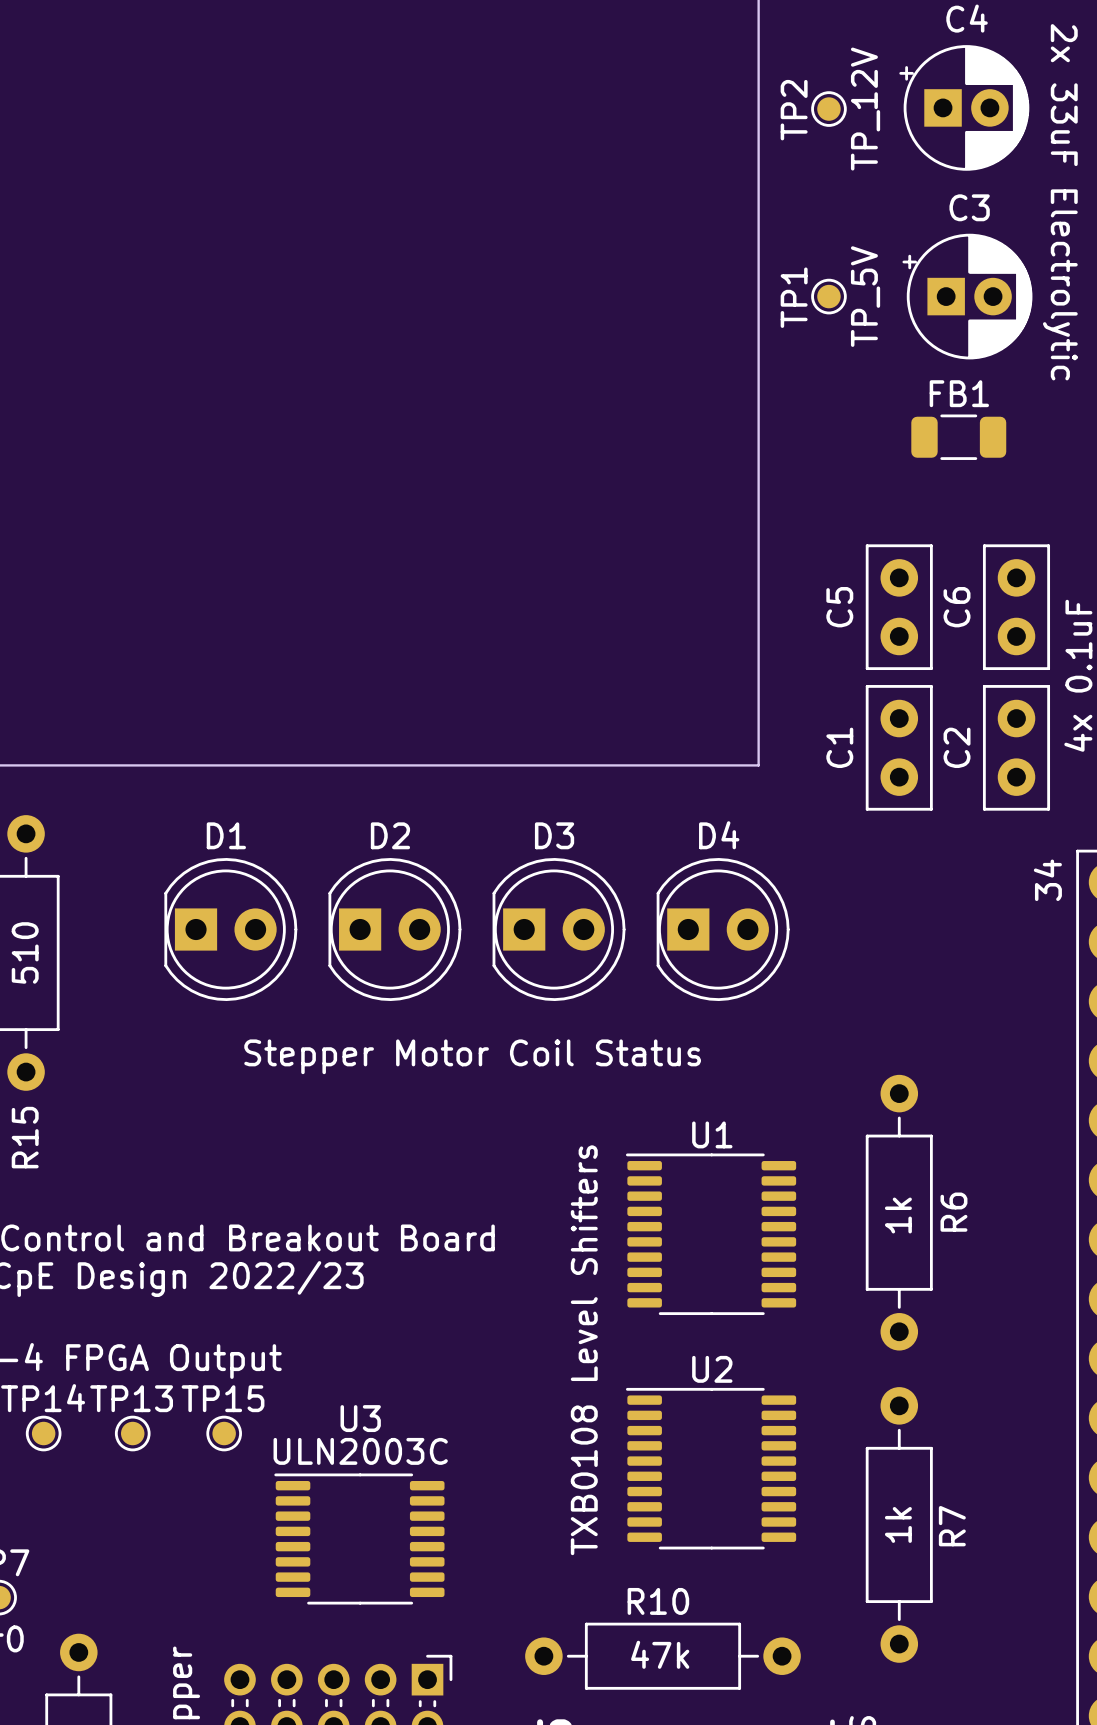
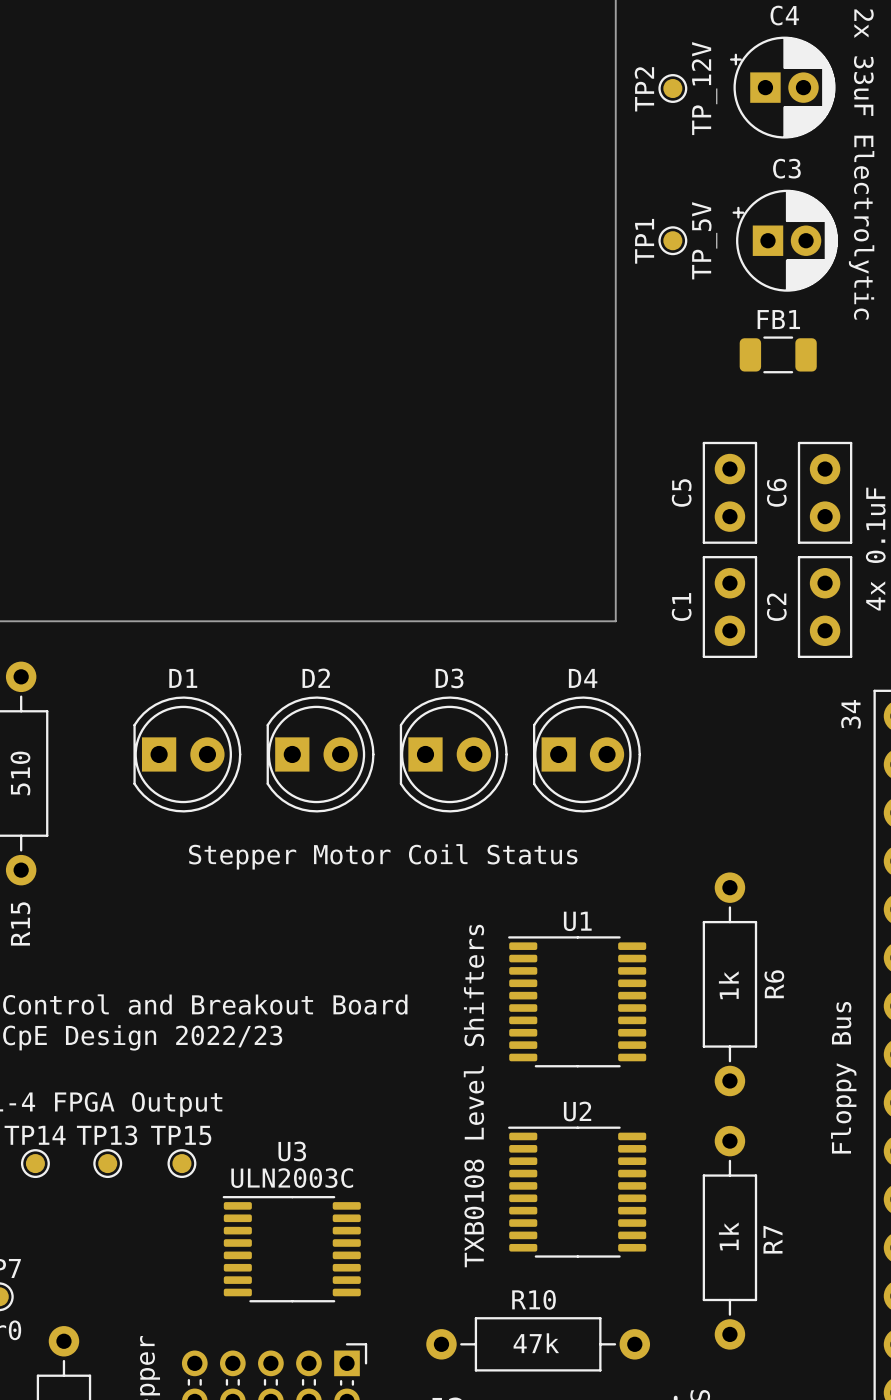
text: none -> Floppy Bus (843, 1077)

